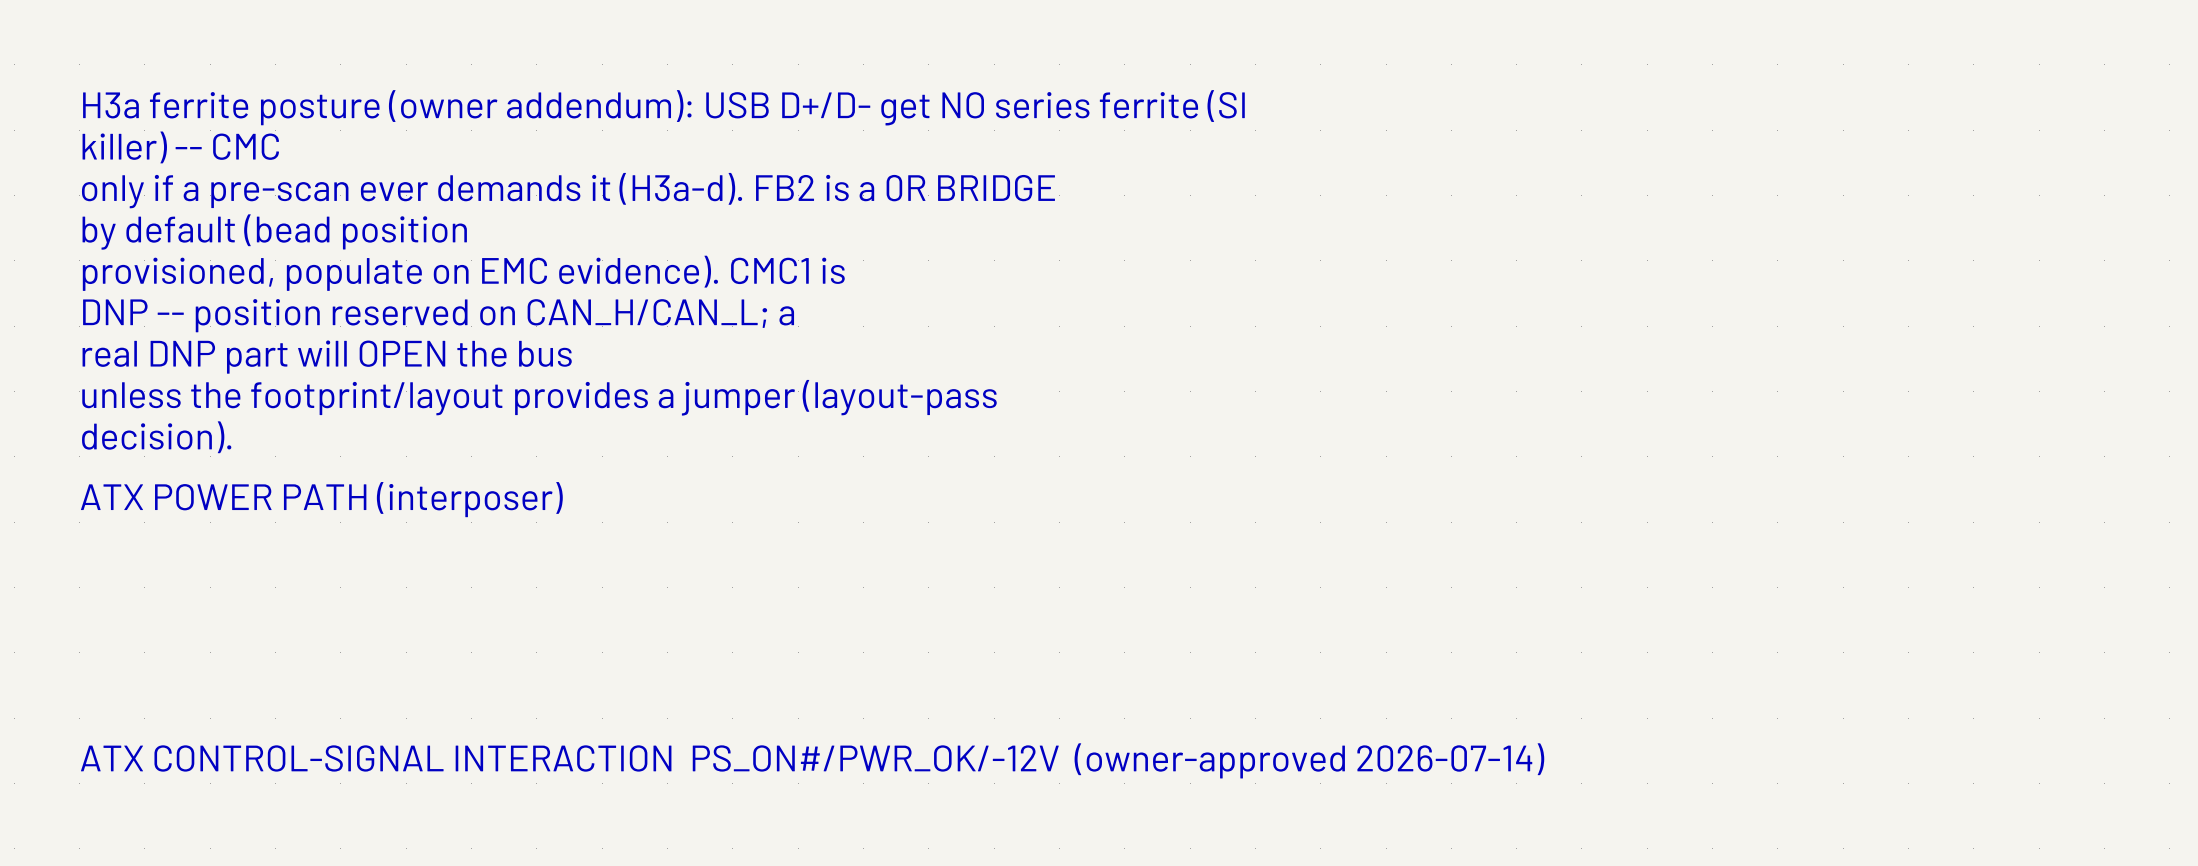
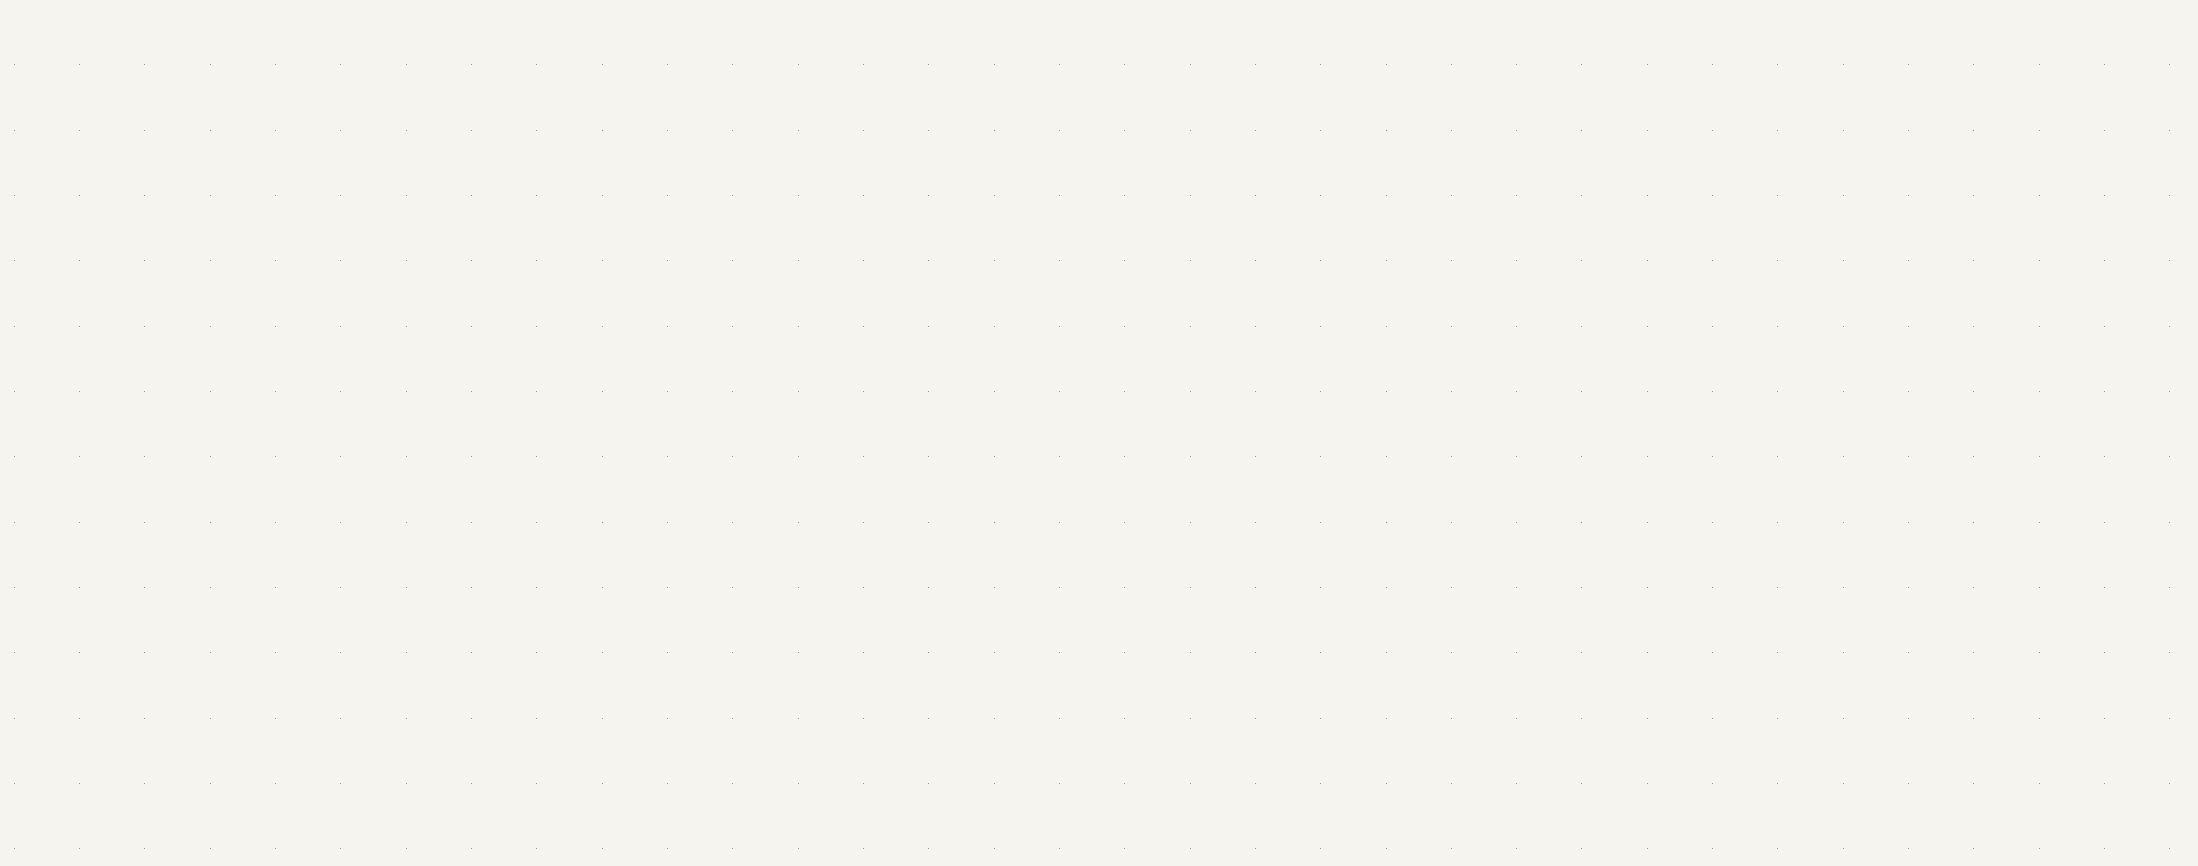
text: H3a ferrite posture (owner addendum): USB D+/D- get NO series ferrite (SI (663, 107) -> none
text: killer) -- CMC (180, 147) -> none
text: only if a pre-scan ever demands it (H3a-d). FB2 is a 0R BRIDGE (568, 190) -> none
text: by default (bead position (274, 232) -> none
text: provisioned, populate on EMC evidence). CMC1 is (463, 273) -> none
text: DNP -- position reserved on CAN_H/CAN_L; a (438, 315) -> none
text: real DNP part will OPEN the bus (327, 357) -> none
text: unless the footprint/layout provides a jumper (layout-pass (539, 397) -> none
text: decision). (156, 437) -> none
text: ATX POWER PATH (interposer) (321, 499) -> none
text: ATX CONTROL-SIGNAL INTERACTION PS_ON#/PWR_OK/-12V (owner-approved 2026-07-14) (812, 760) -> none

